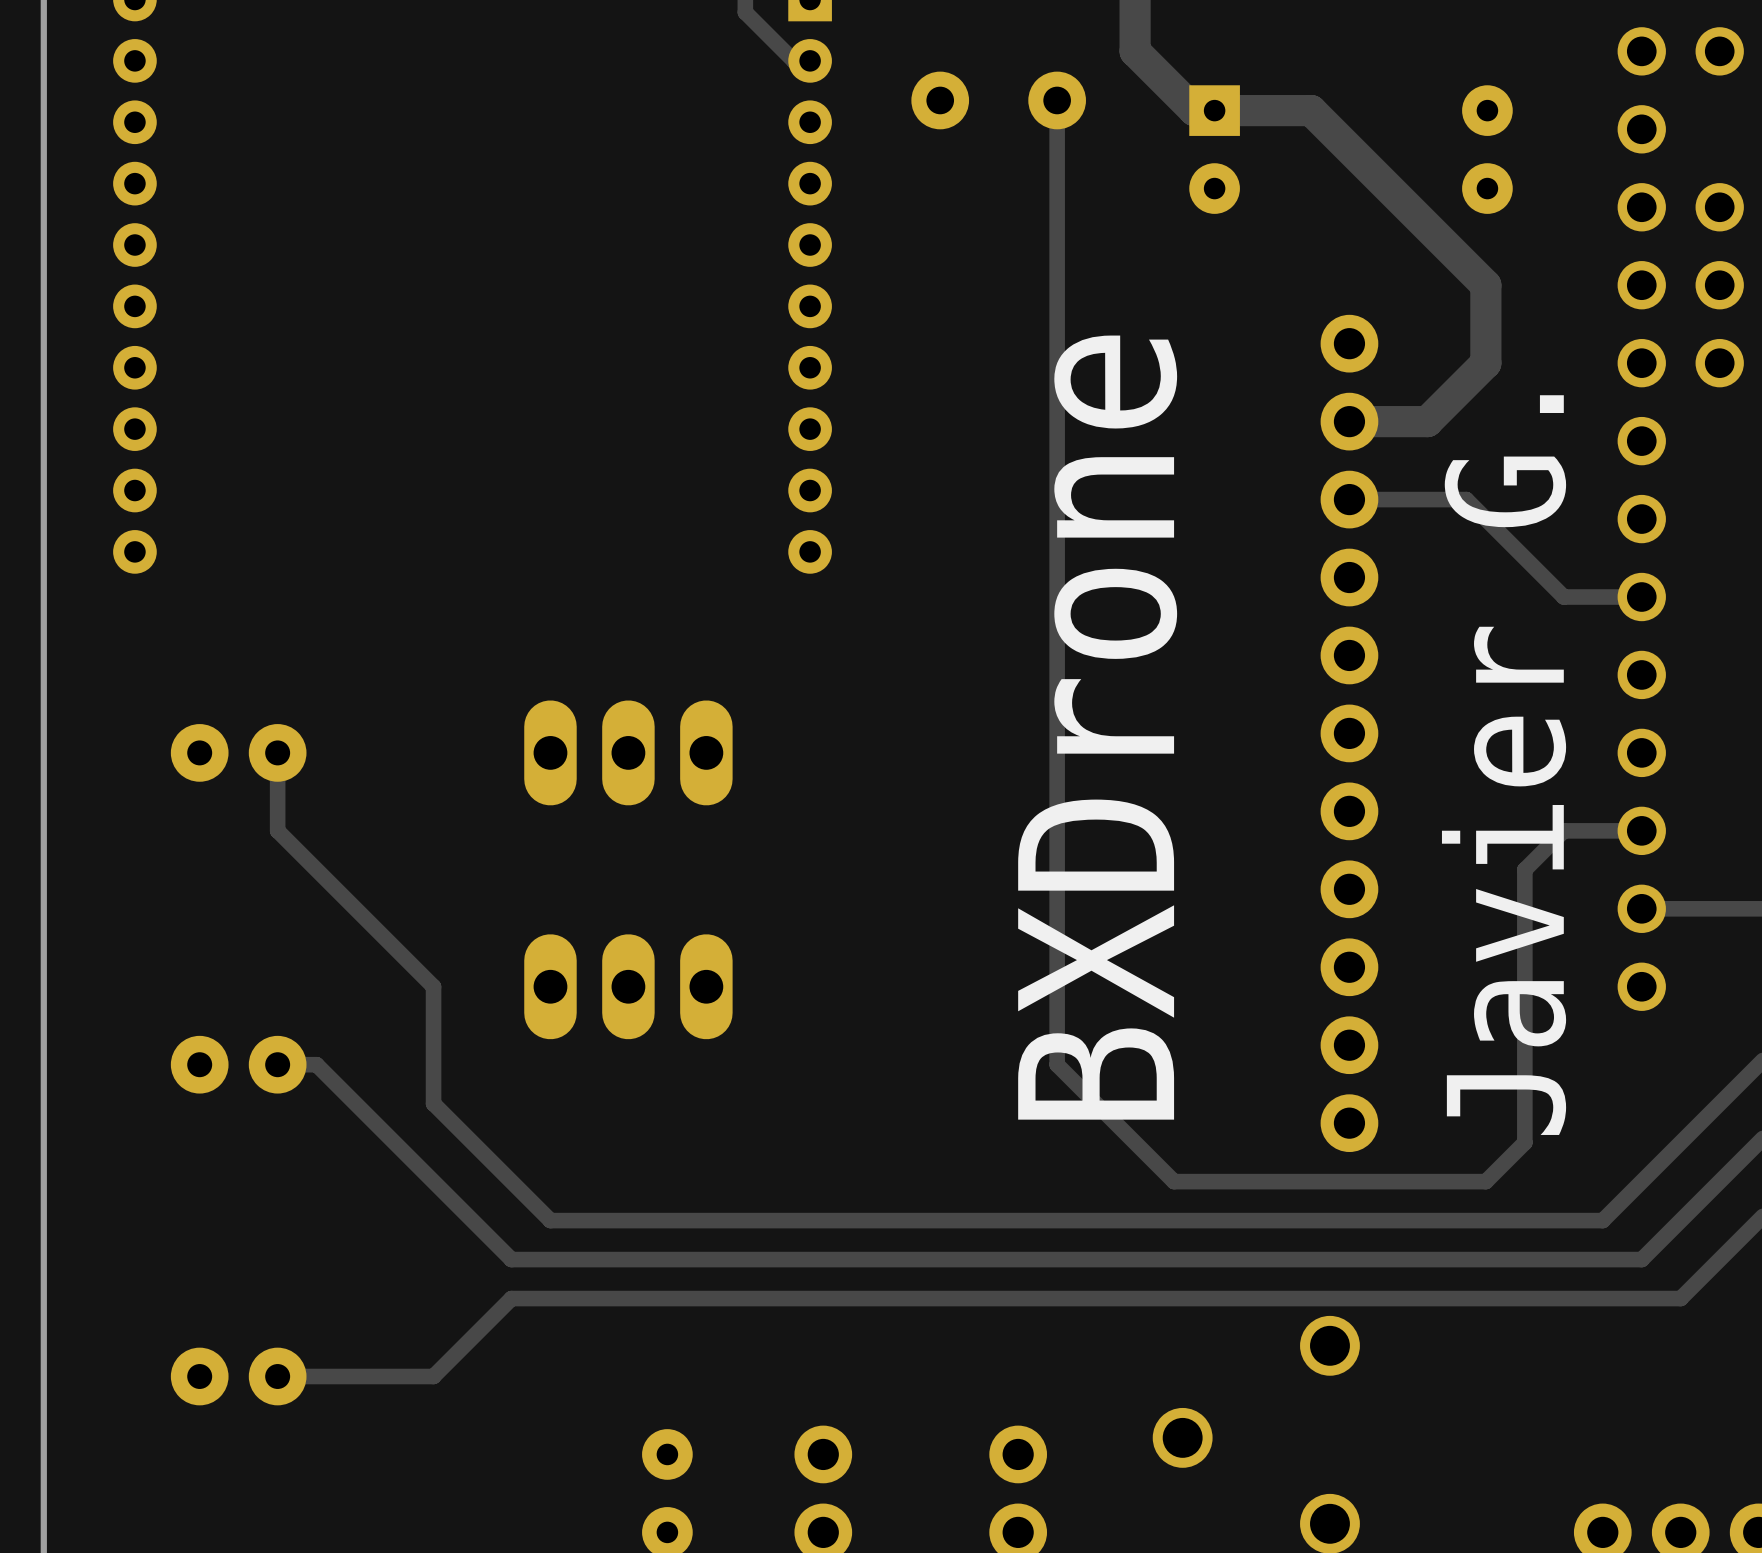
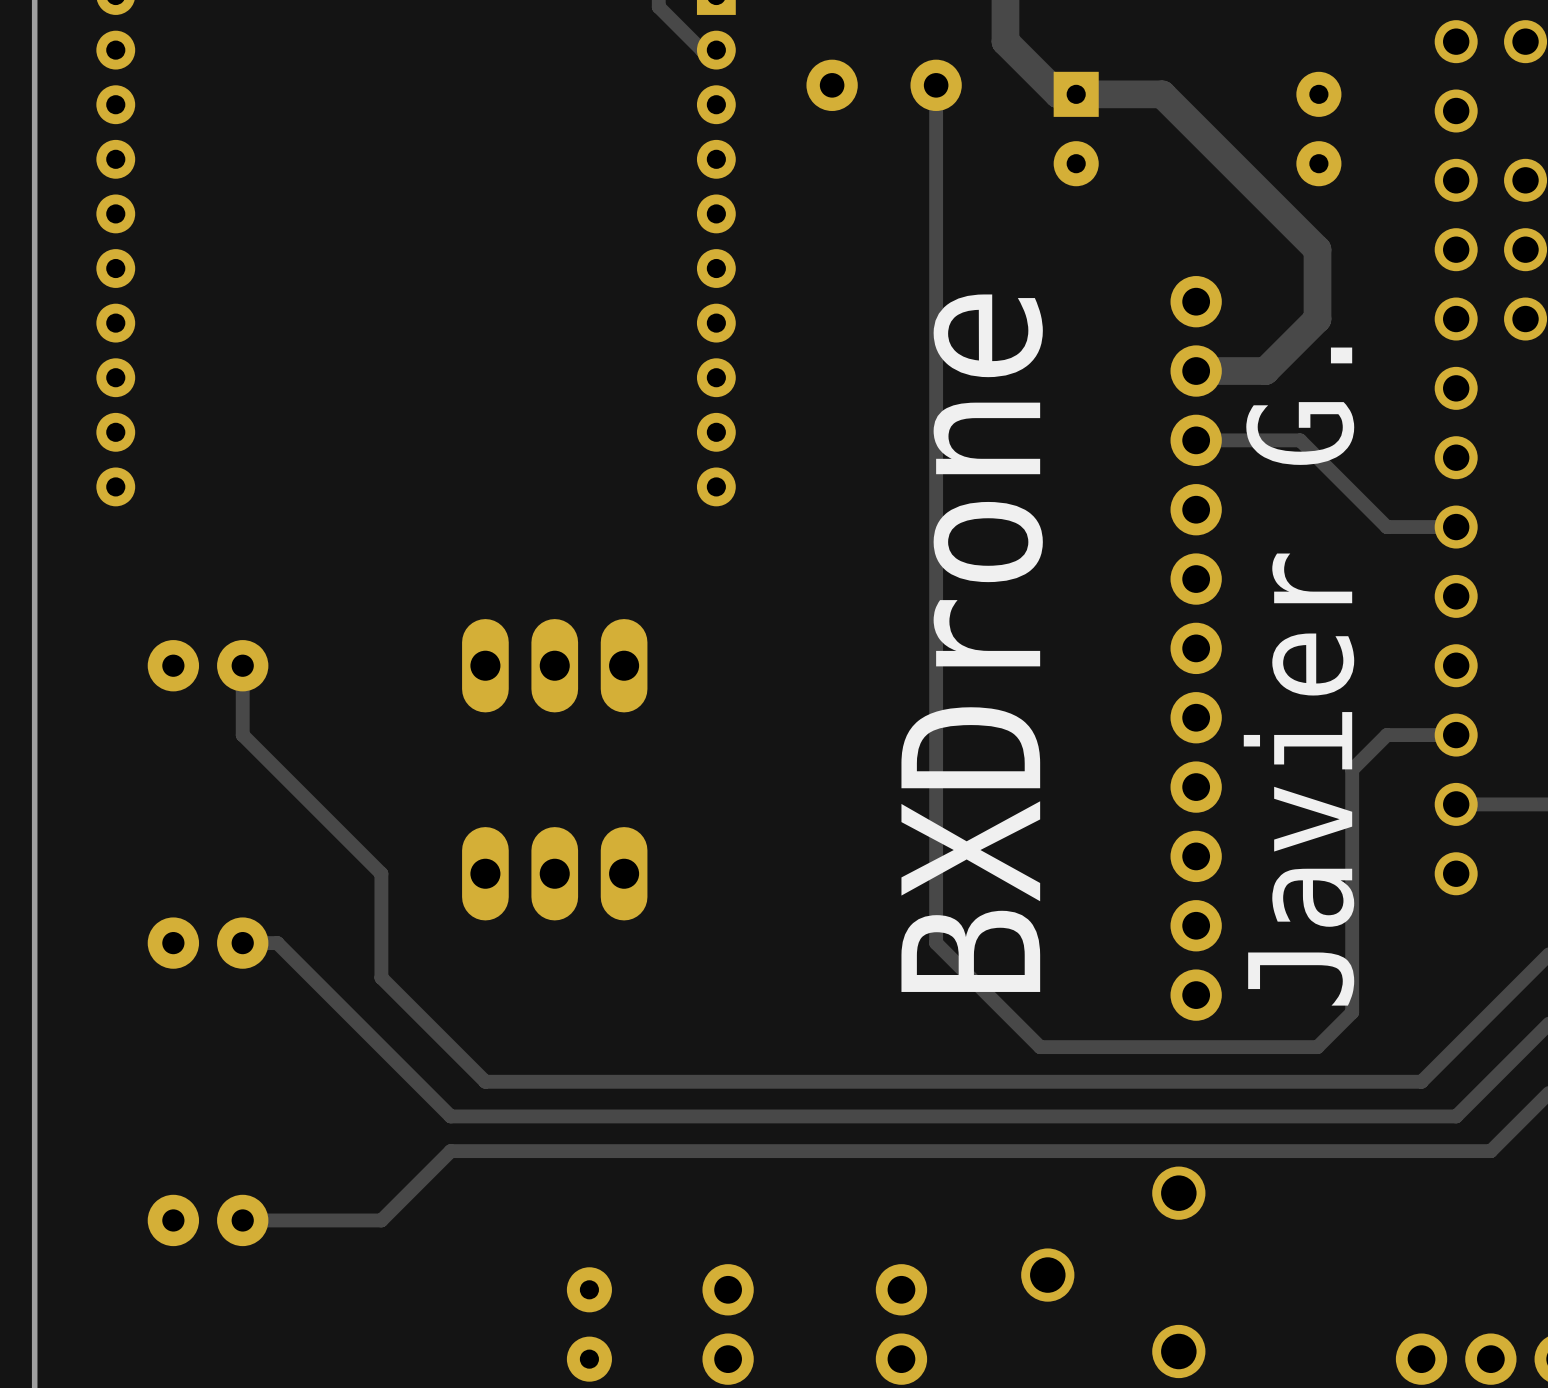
text position: Javier G. (1504, 765) -> Javier G. (1298, 676)

